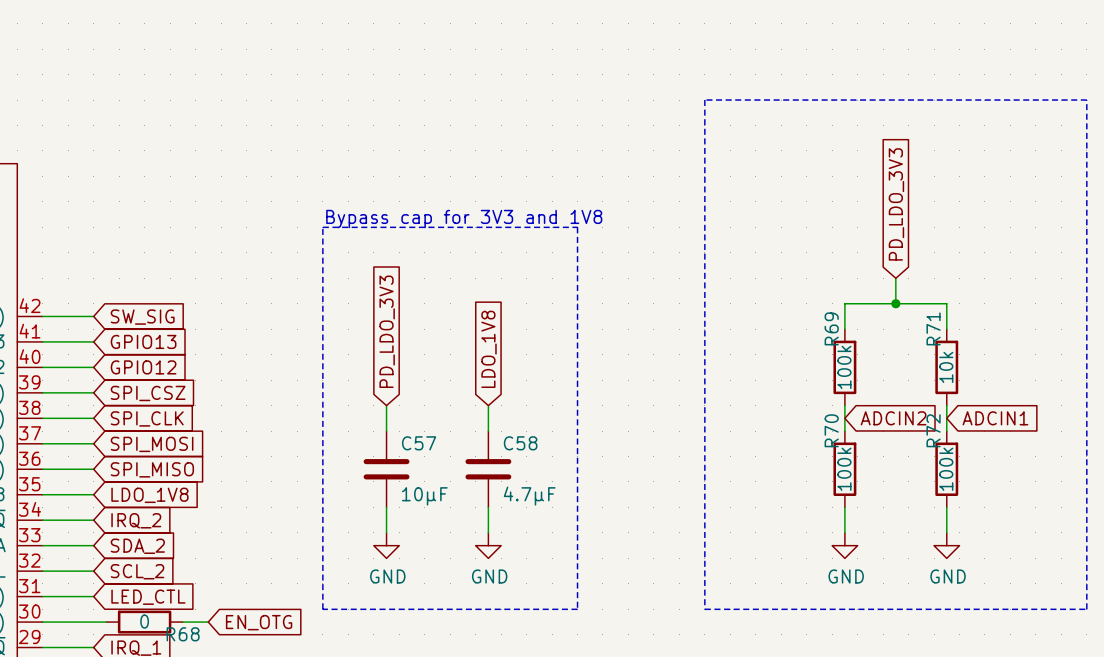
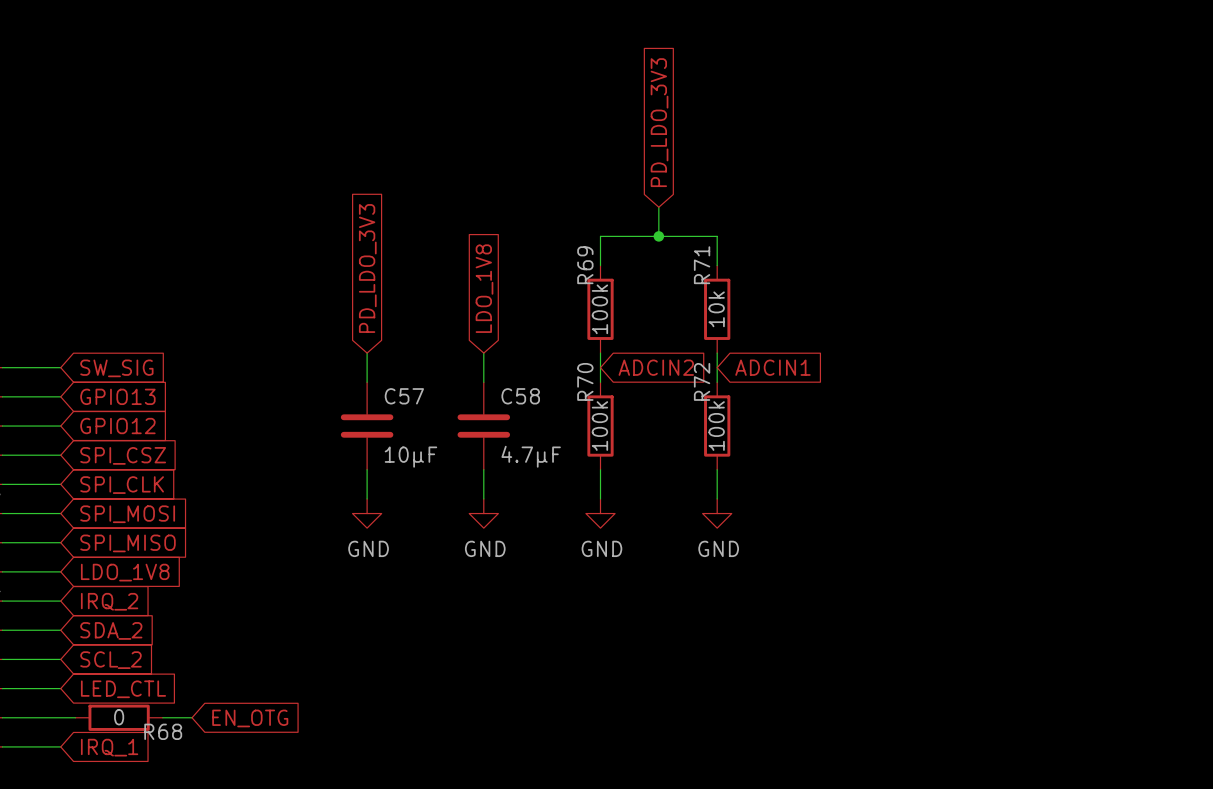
line: (704, 100) (1086, 100) (1086, 609) (704, 609) (704, 100) -> none
global label: none -> PD_LDO_3V3 (659, 122)
wire: none -> (658, 207) (658, 236)
junction: none -> (658, 236)
global label: PD_LDO_3V3 (896, 204) -> none
text: Bypass cap for 3V3 and 1V8 (464, 219) -> none
line: (322, 227) (577, 227) (577, 609) (322, 609) (322, 227) -> none
wire: none -> (600, 265) (600, 236) (717, 236) (717, 265)
wire: (895, 278) (895, 303) -> none
wire: none -> (600, 353) (600, 382)
junction: (895, 303) -> none
global label: none -> ADCIN2 (656, 367)
global label: none -> ADCIN1 (772, 367)
wire: (844, 329) (844, 303) (946, 303) (946, 329) -> none
global label position: PD_LDO_3V3 (387, 331) -> PD_LDO_3V3 (367, 268)
global label position: LDO_1V8 (489, 349) -> LDO_1V8 (484, 288)
R69 position: (844, 367) -> (600, 309)
R71 position: (946, 367) -> (717, 309)
wire: (386, 405) (386, 431) -> (367, 353) (367, 382)
wire: (488, 405) (488, 431) -> (483, 353) (483, 382)
wire: none -> (600, 469) (600, 498)
wire: (844, 405) (844, 431) -> (717, 353) (717, 382)
wire: (946, 405) (946, 431) -> none
global label: ADCIN2 (893, 418) -> none
global label: ADCIN1 (995, 418) -> none
power symbol: none -> GND (367, 513)
power symbol: none -> GND (483, 513)
power symbol: none -> GND (600, 513)
power symbol: none -> GND (717, 513)
C57 position: (386, 469) -> (367, 426)
C58 position: (488, 469) -> (483, 426)
R70 position: (844, 469) -> (600, 426)
R72 position: (946, 469) -> (717, 426)
wire: (386, 507) (386, 532) -> (367, 469) (367, 498)
wire: (488, 507) (488, 532) -> (483, 469) (483, 498)
wire: (844, 507) (844, 532) -> (717, 469) (717, 498)
wire: (946, 507) (946, 532) -> none
power symbol: GND (386, 545) -> none
power symbol: GND (488, 545) -> none
power symbol: GND (844, 545) -> none
power symbol: GND (946, 545) -> none

